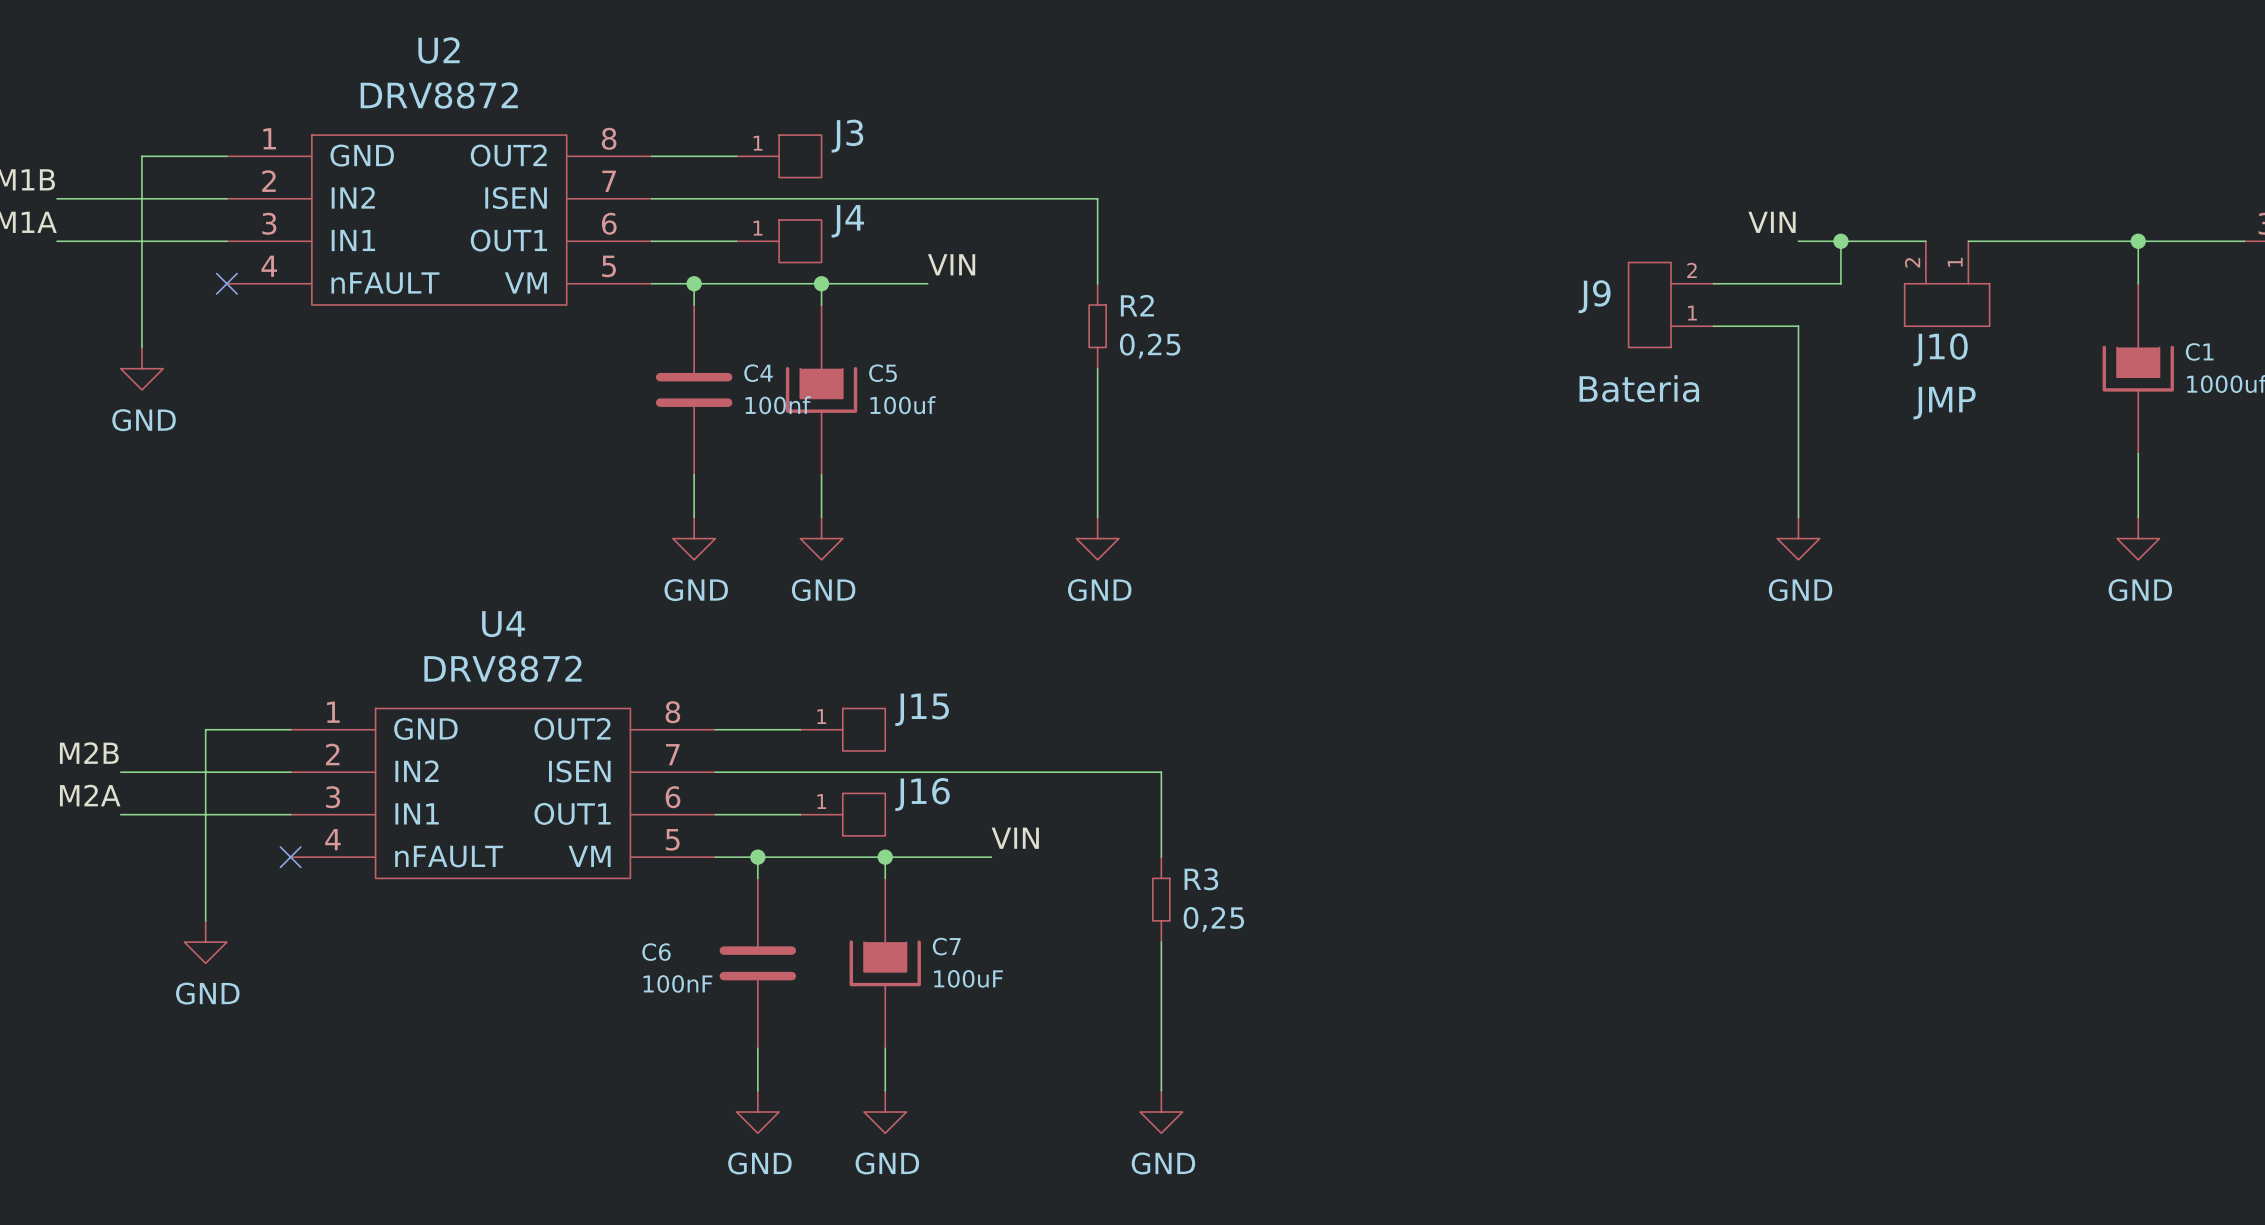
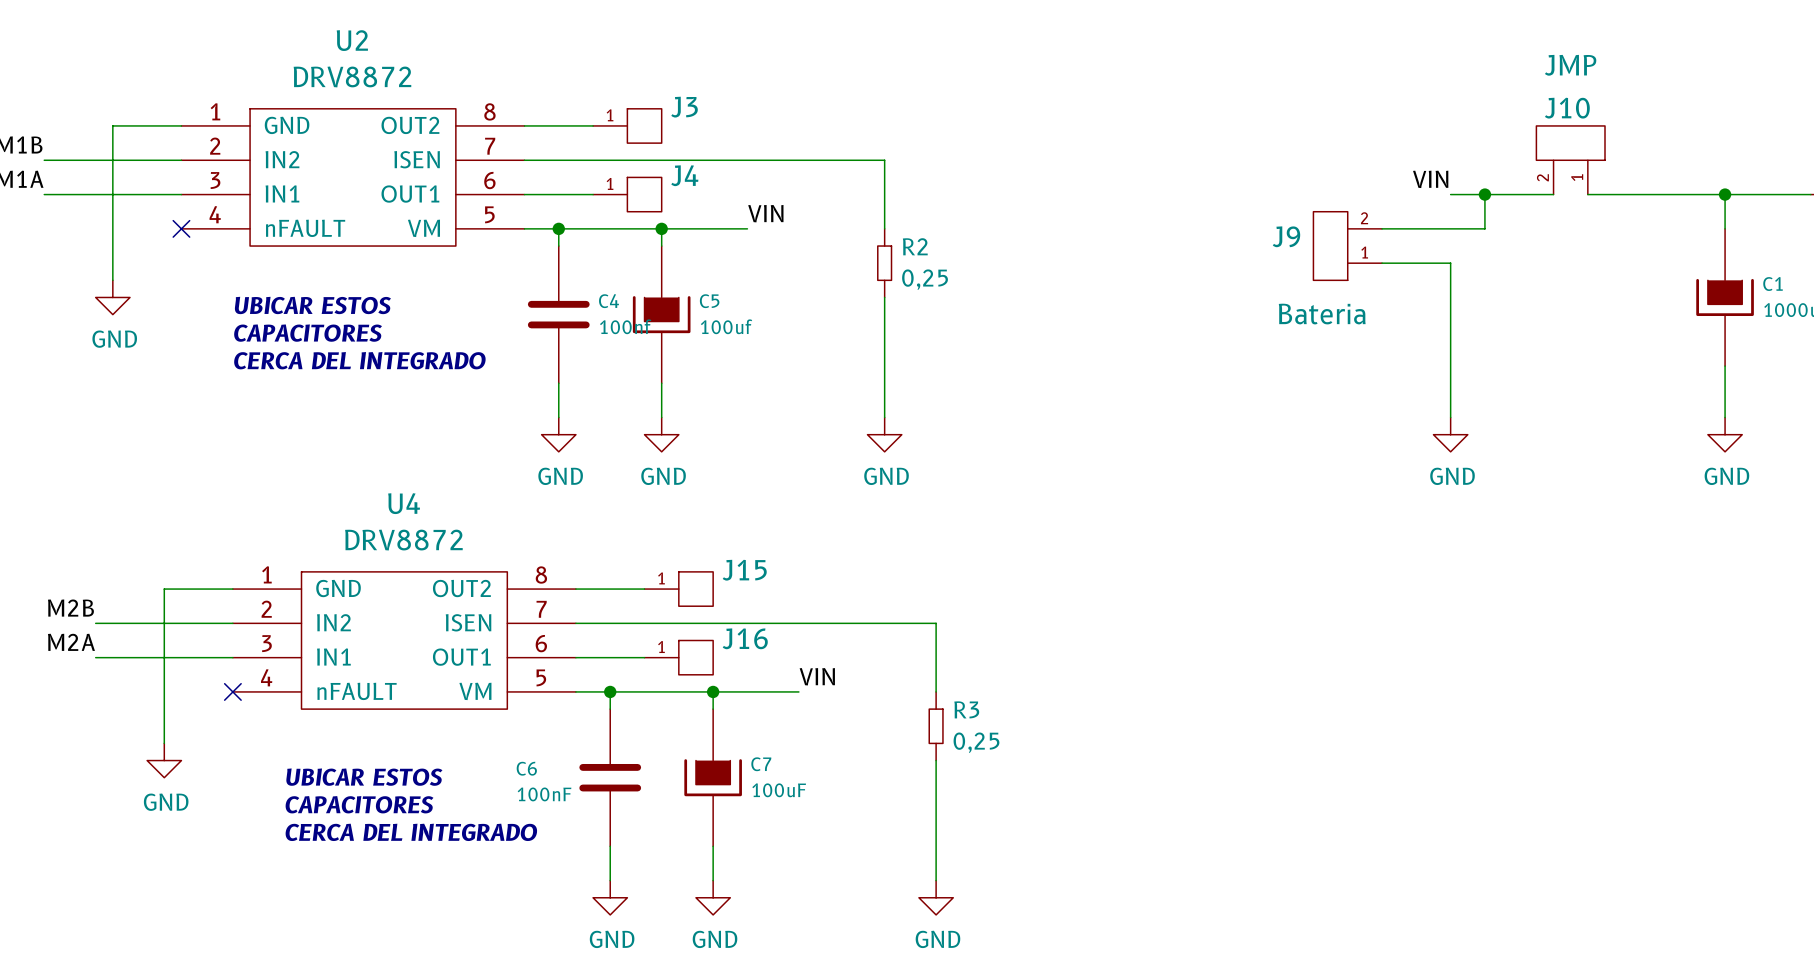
J10 position: (1947, 283) -> (1570, 160)
J10 flip: as is (1947, 304) -> up-down (1570, 143)
text: none -> UBICAR ESTOS (312, 305)
text: none -> CAPACITORES (308, 333)
text: none -> CERCA DEL INTEGRADO (359, 360)
text: none -> UBICAR ESTOS (364, 777)
text: none -> CAPACITORES (359, 804)
text: none -> CERCA DEL INTEGRADO (411, 832)

